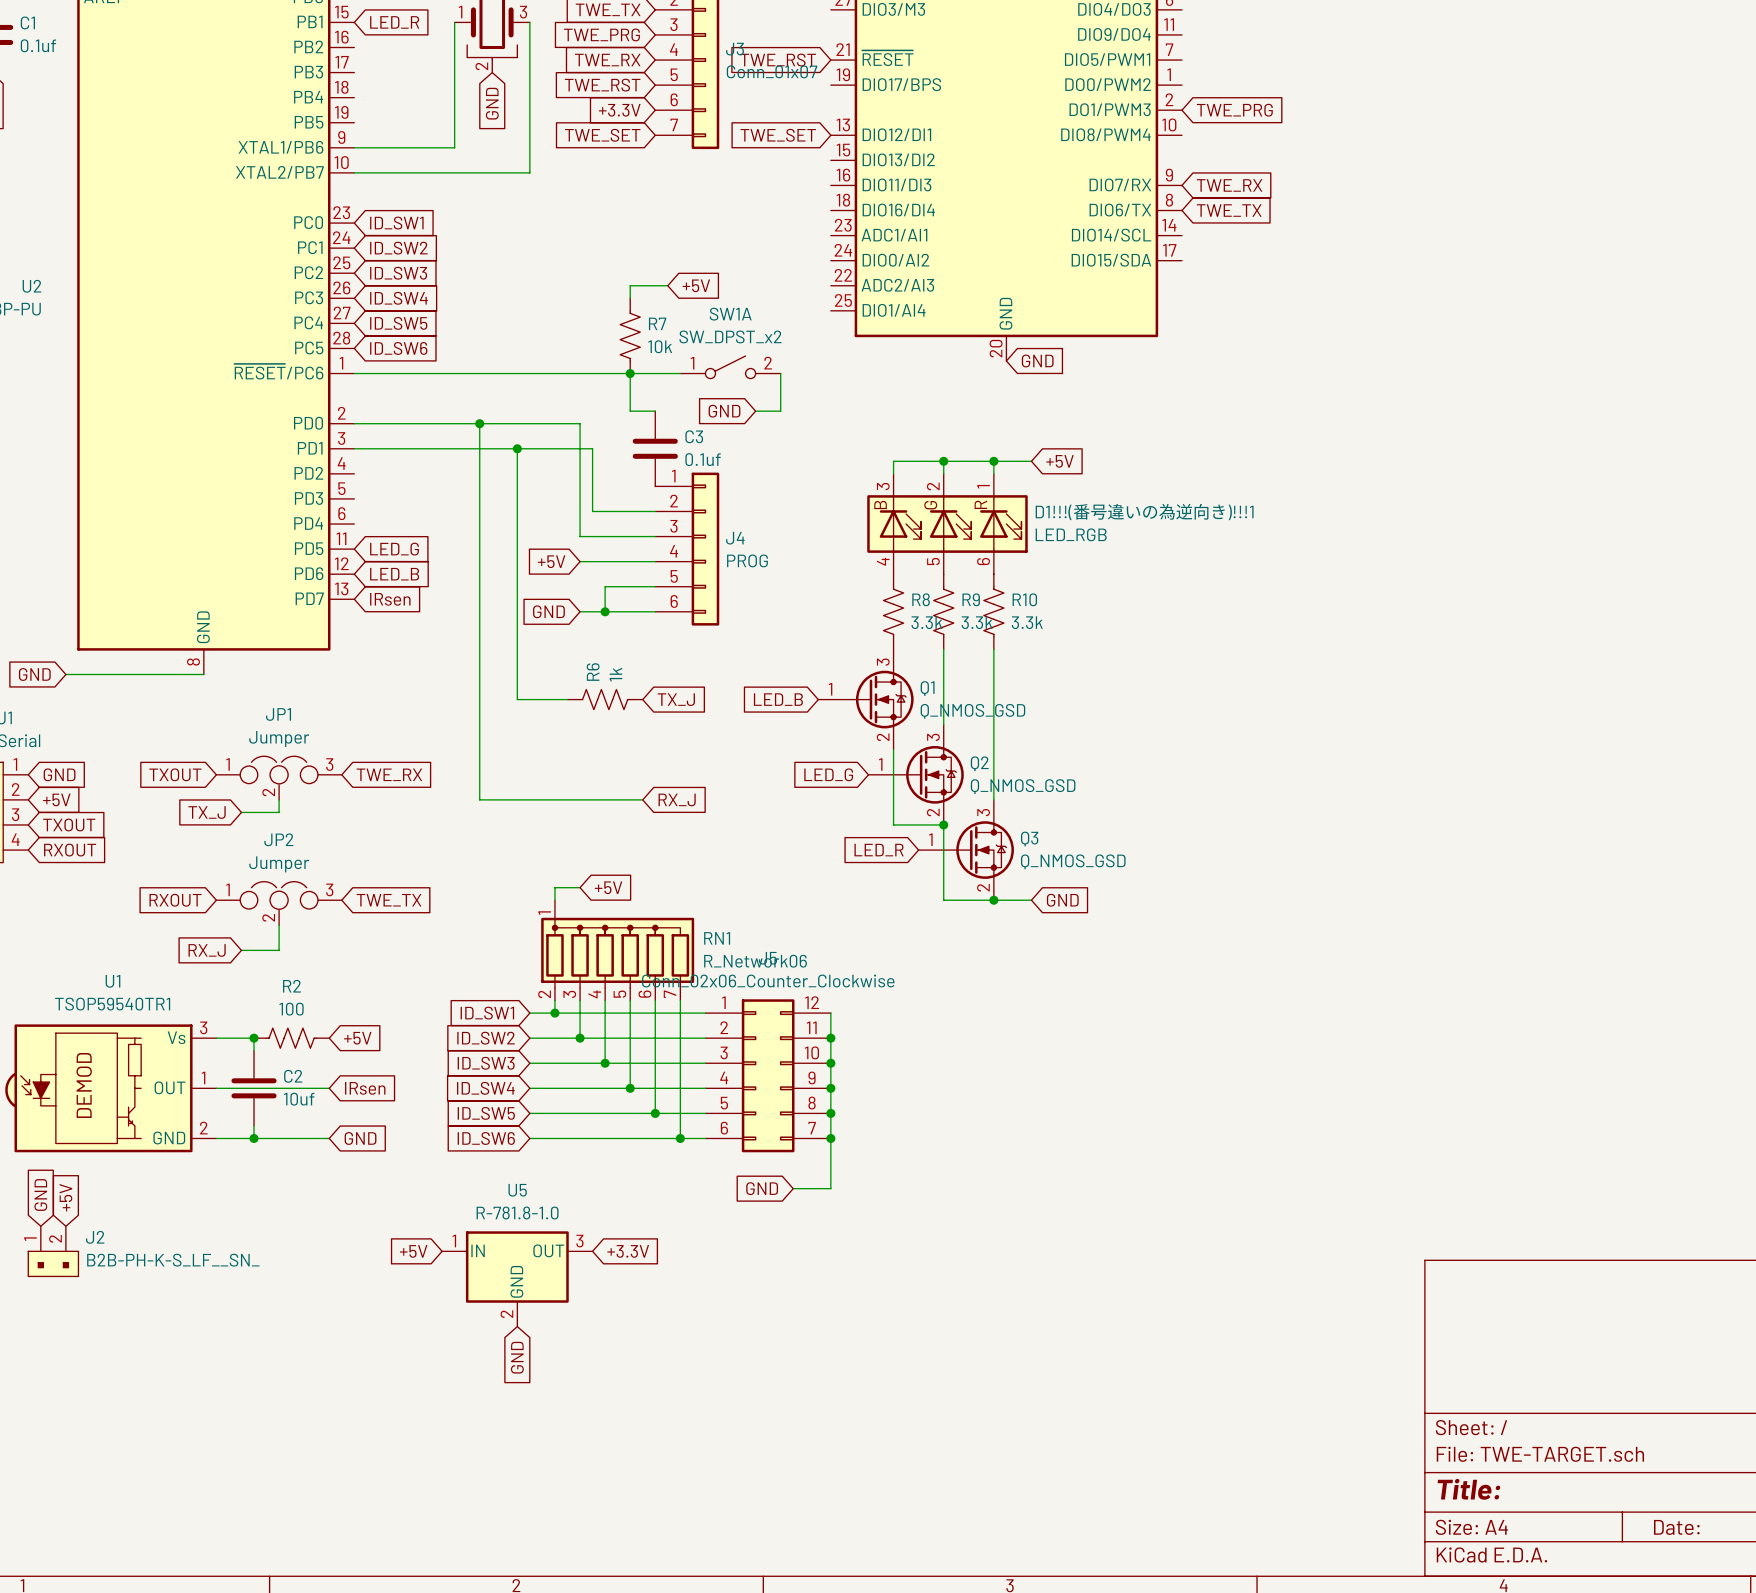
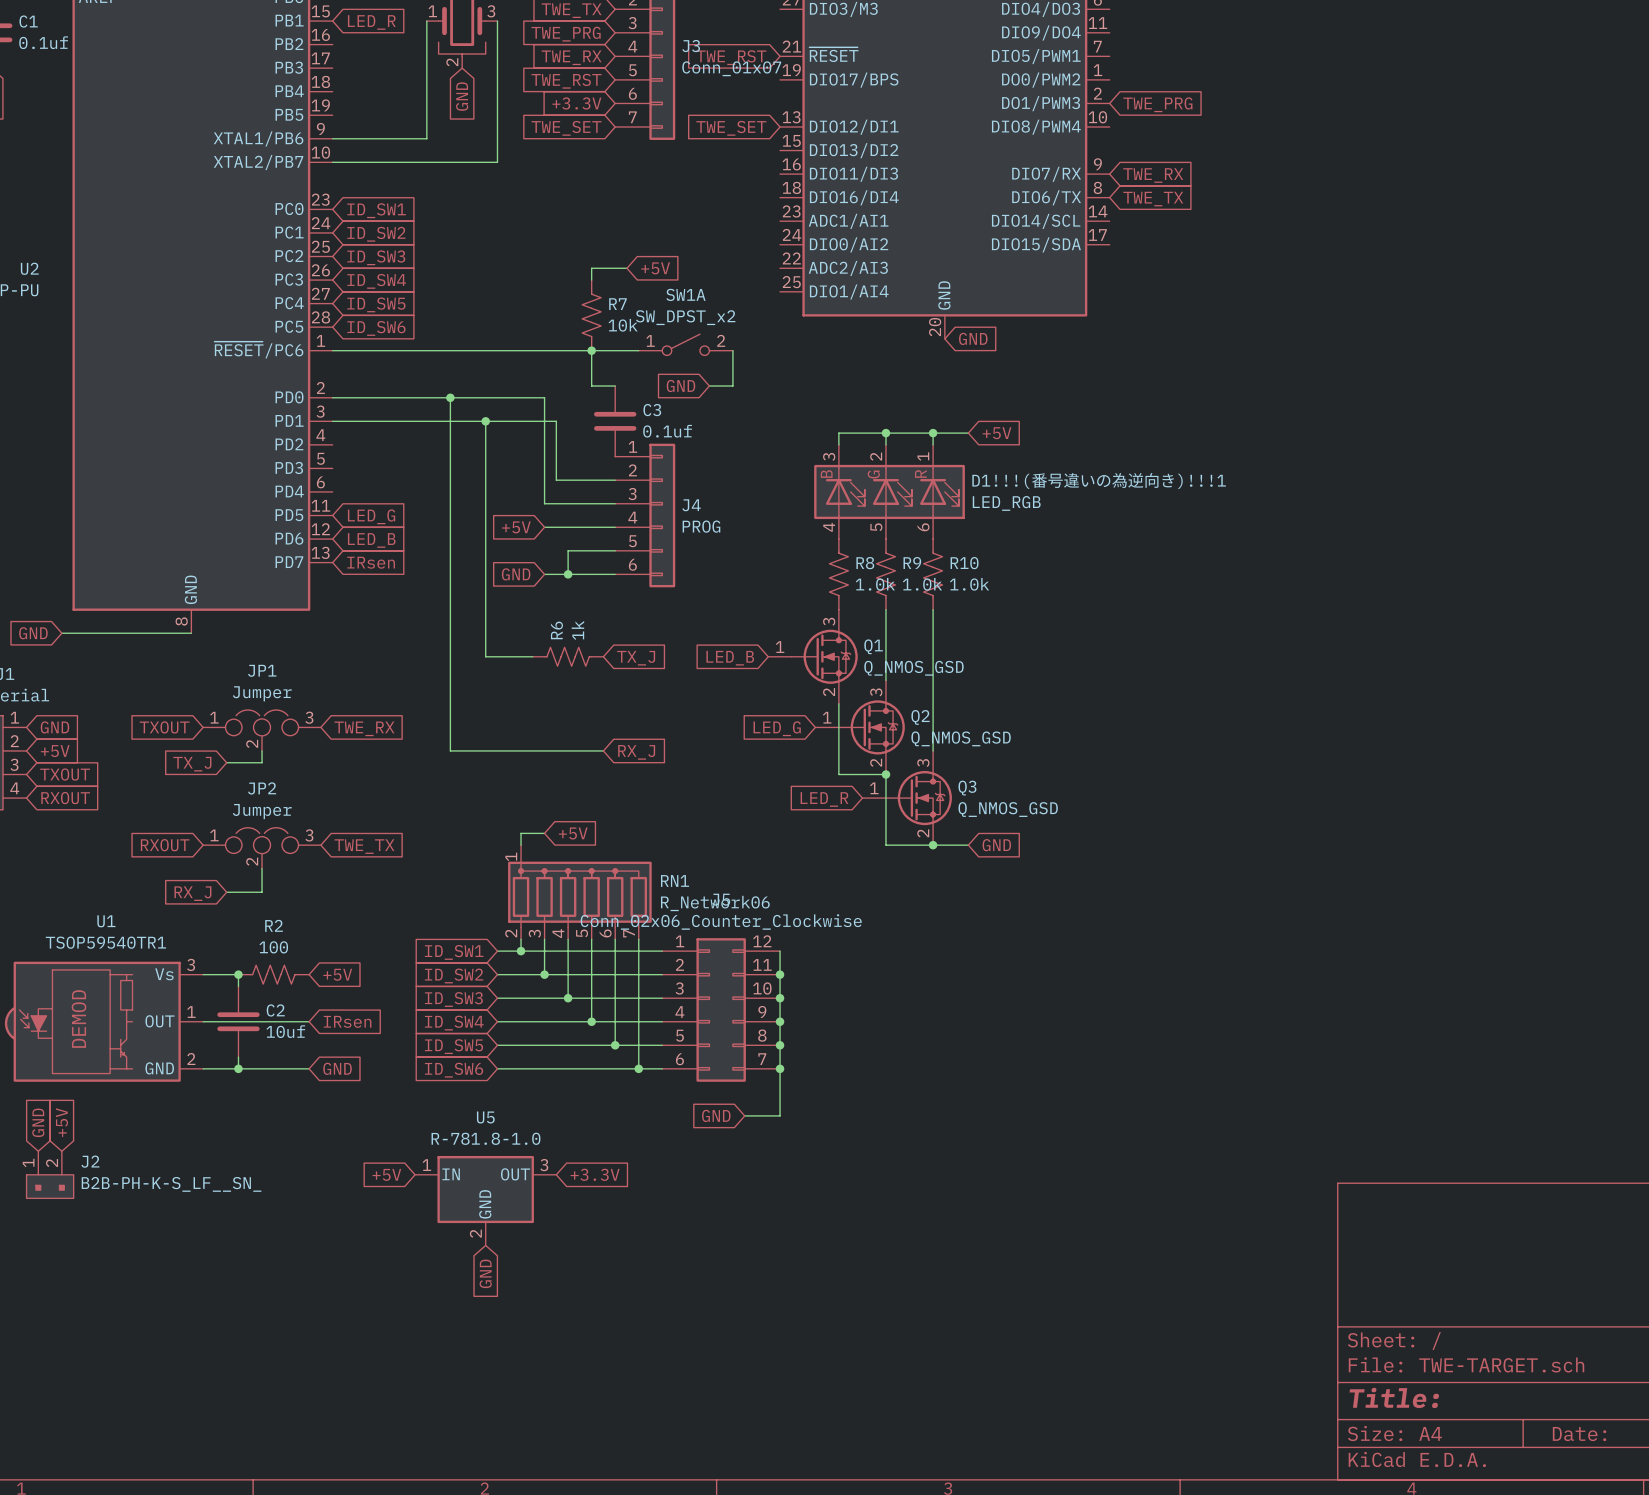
R8 value: 3.3k (926, 622) -> 1.0k (875, 584)
R9 value: 3.3k (977, 622) -> 1.0k (922, 584)
R10 value: 3.3k (1027, 622) -> 1.0k (969, 584)

